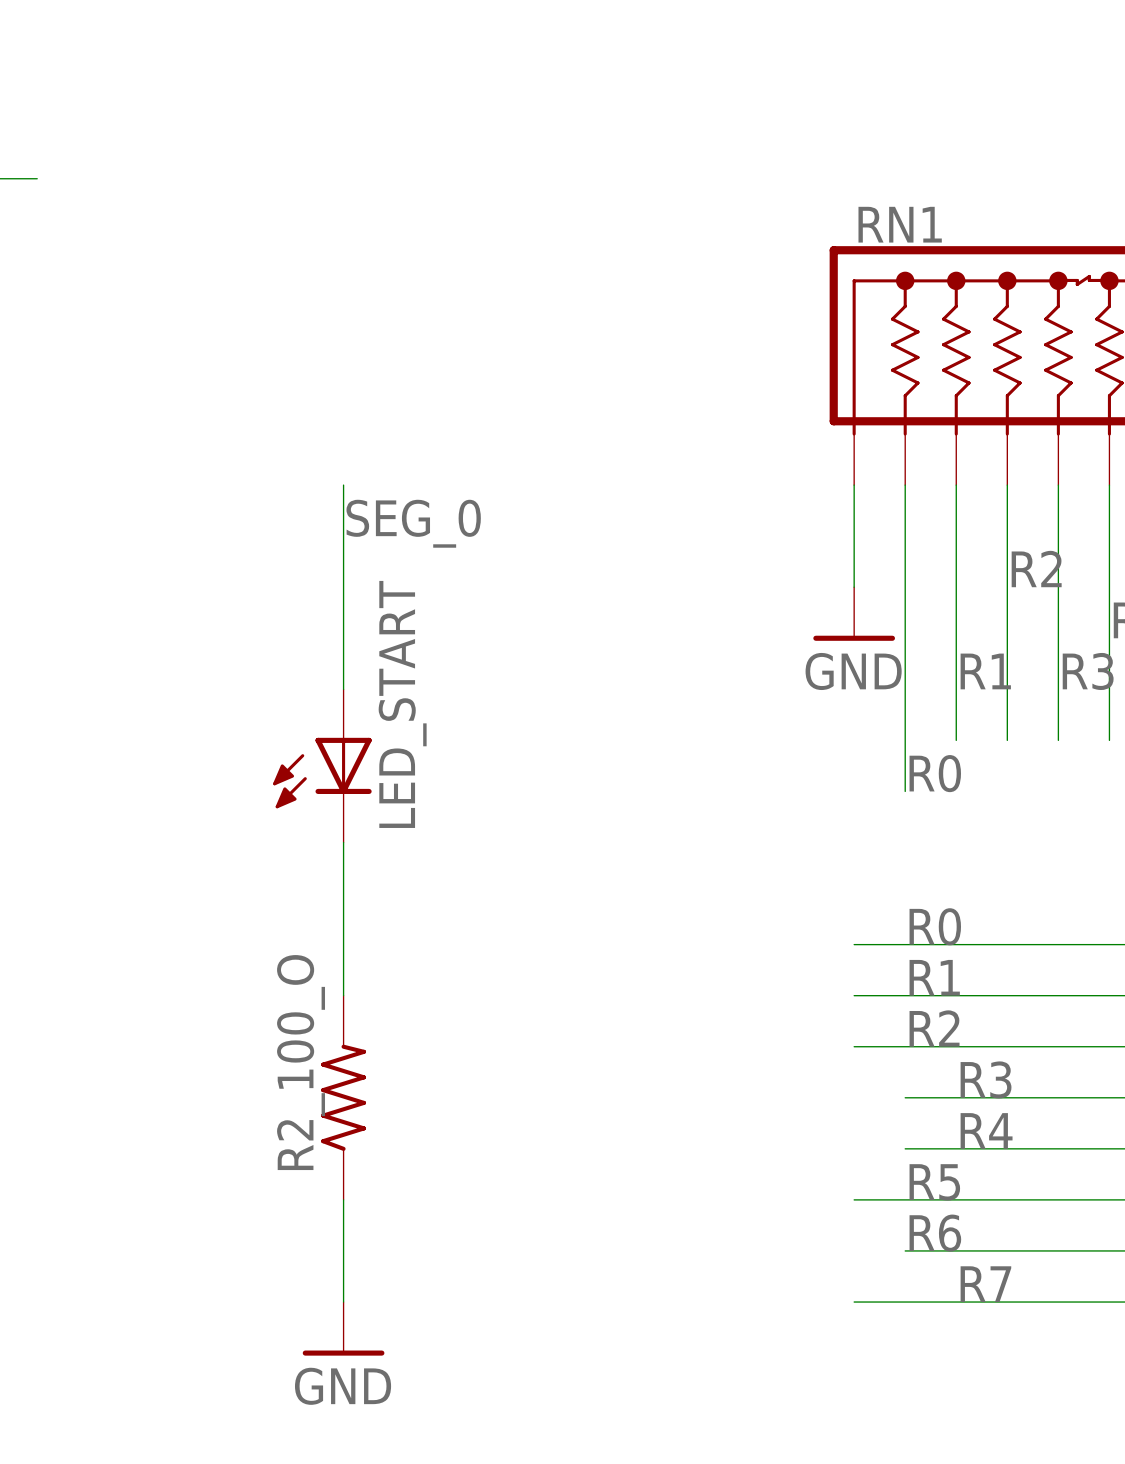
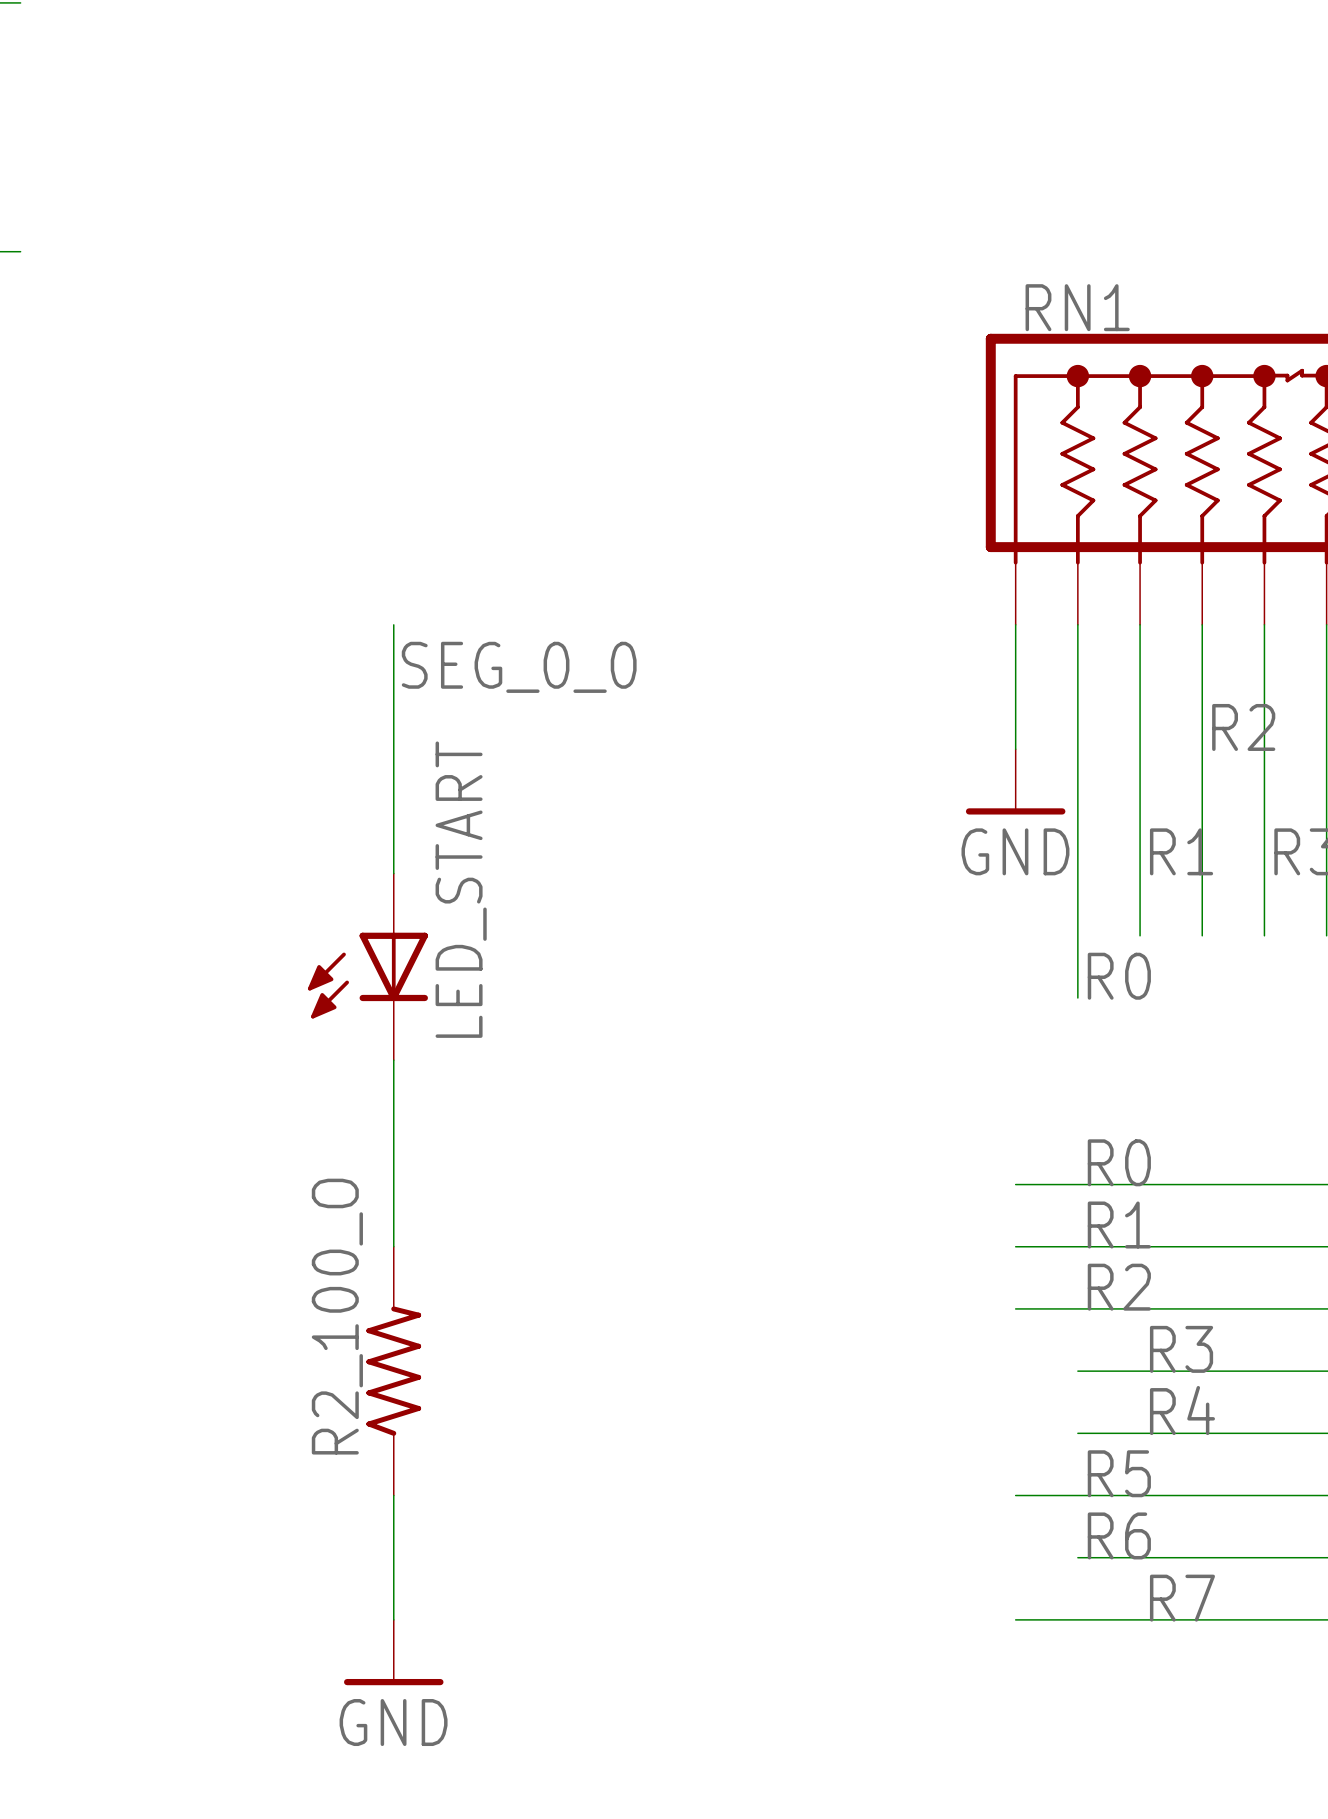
label: SEG_0 (413, 523) -> SEG_0_0 (519, 667)

